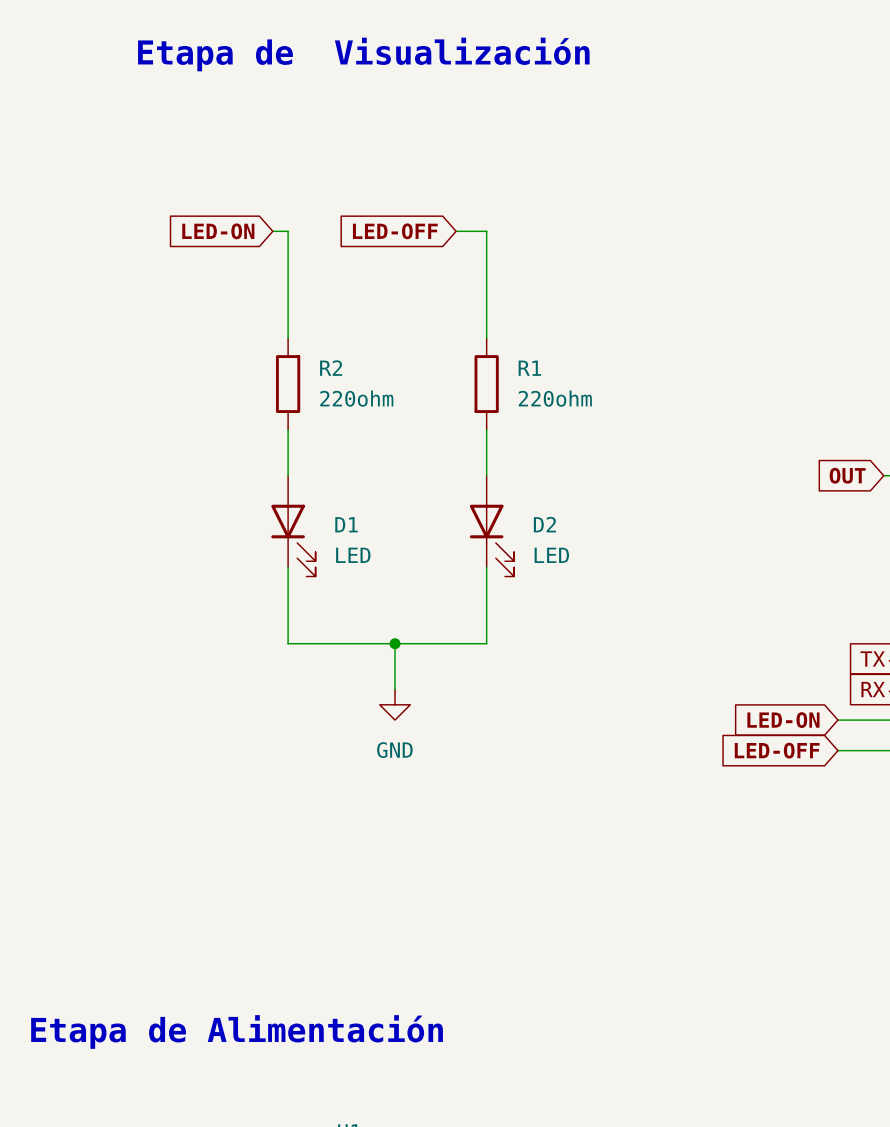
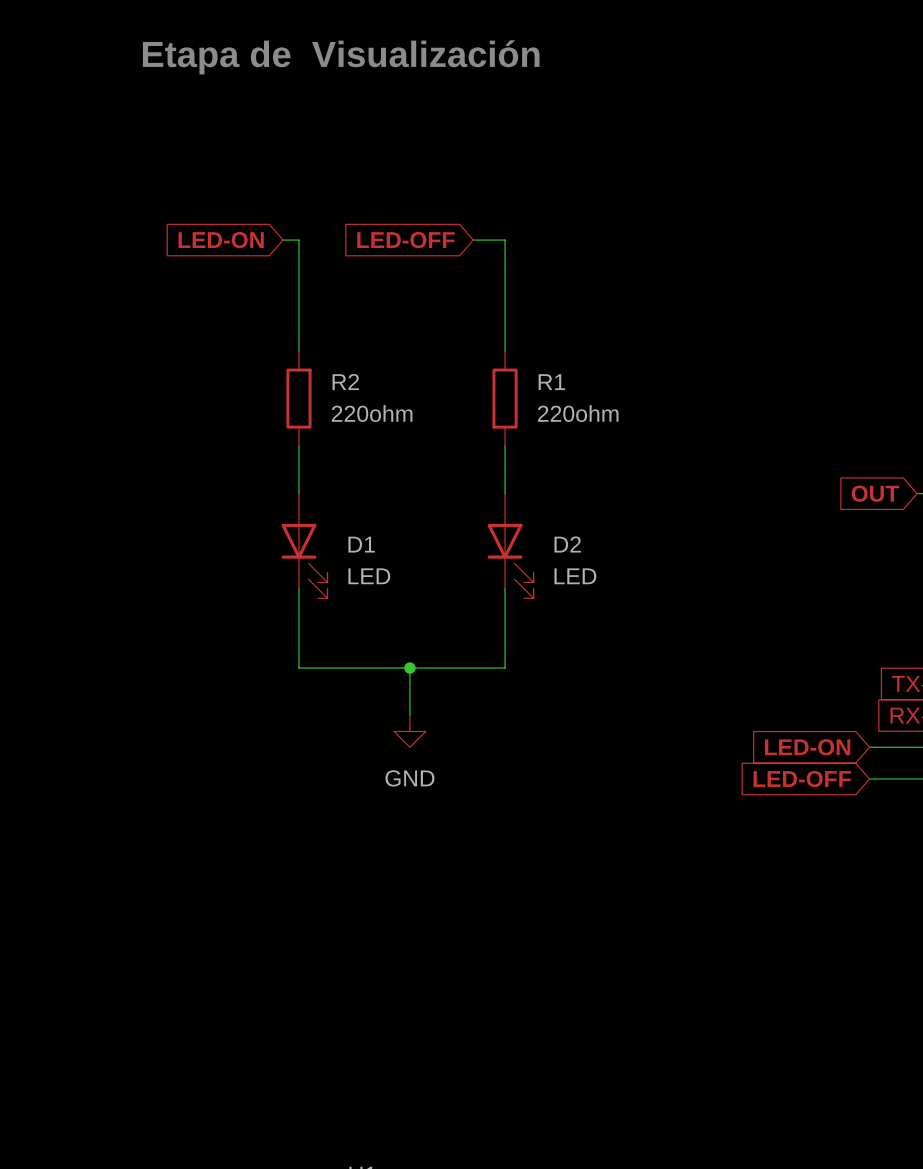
text: Etapa de Alimentación (237, 1031) -> none

